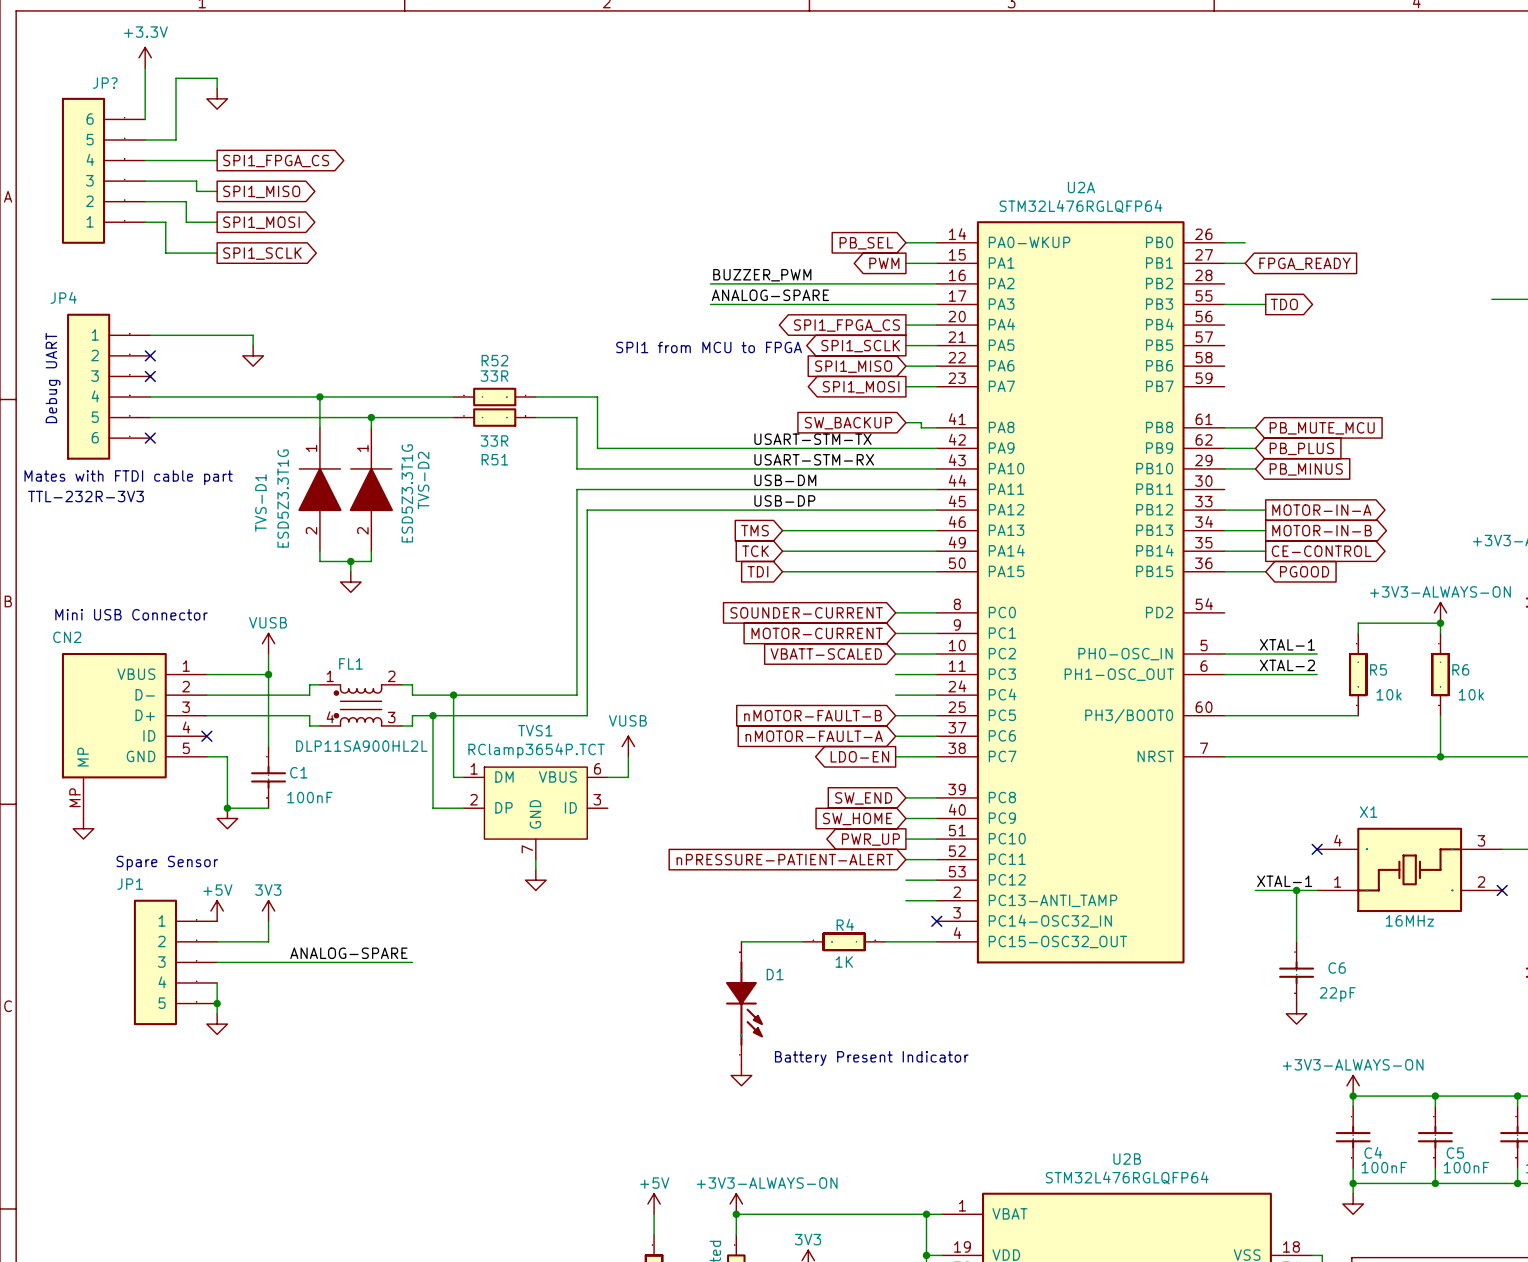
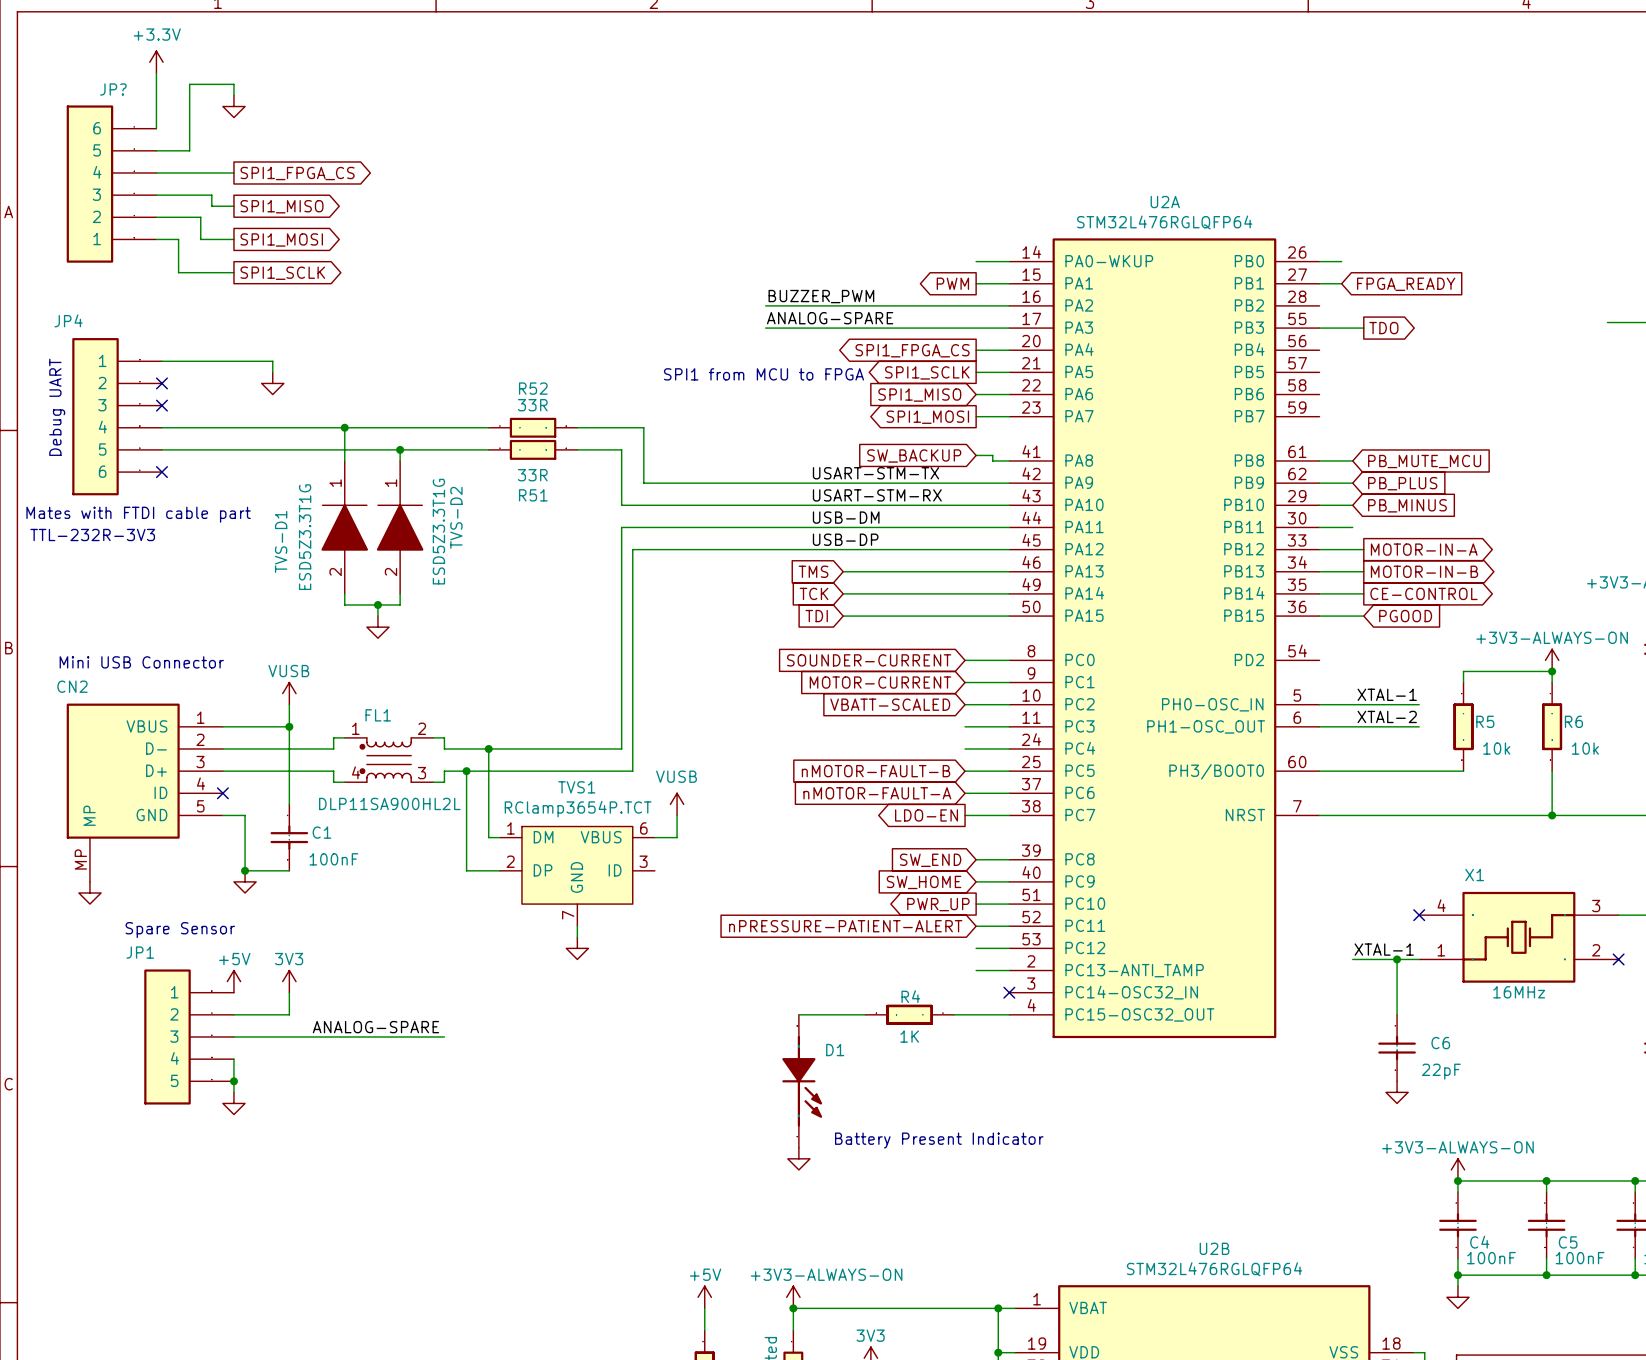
global label: PB_SEL (866, 243) -> none
wire: none -> (1319, 527) (1352, 527)

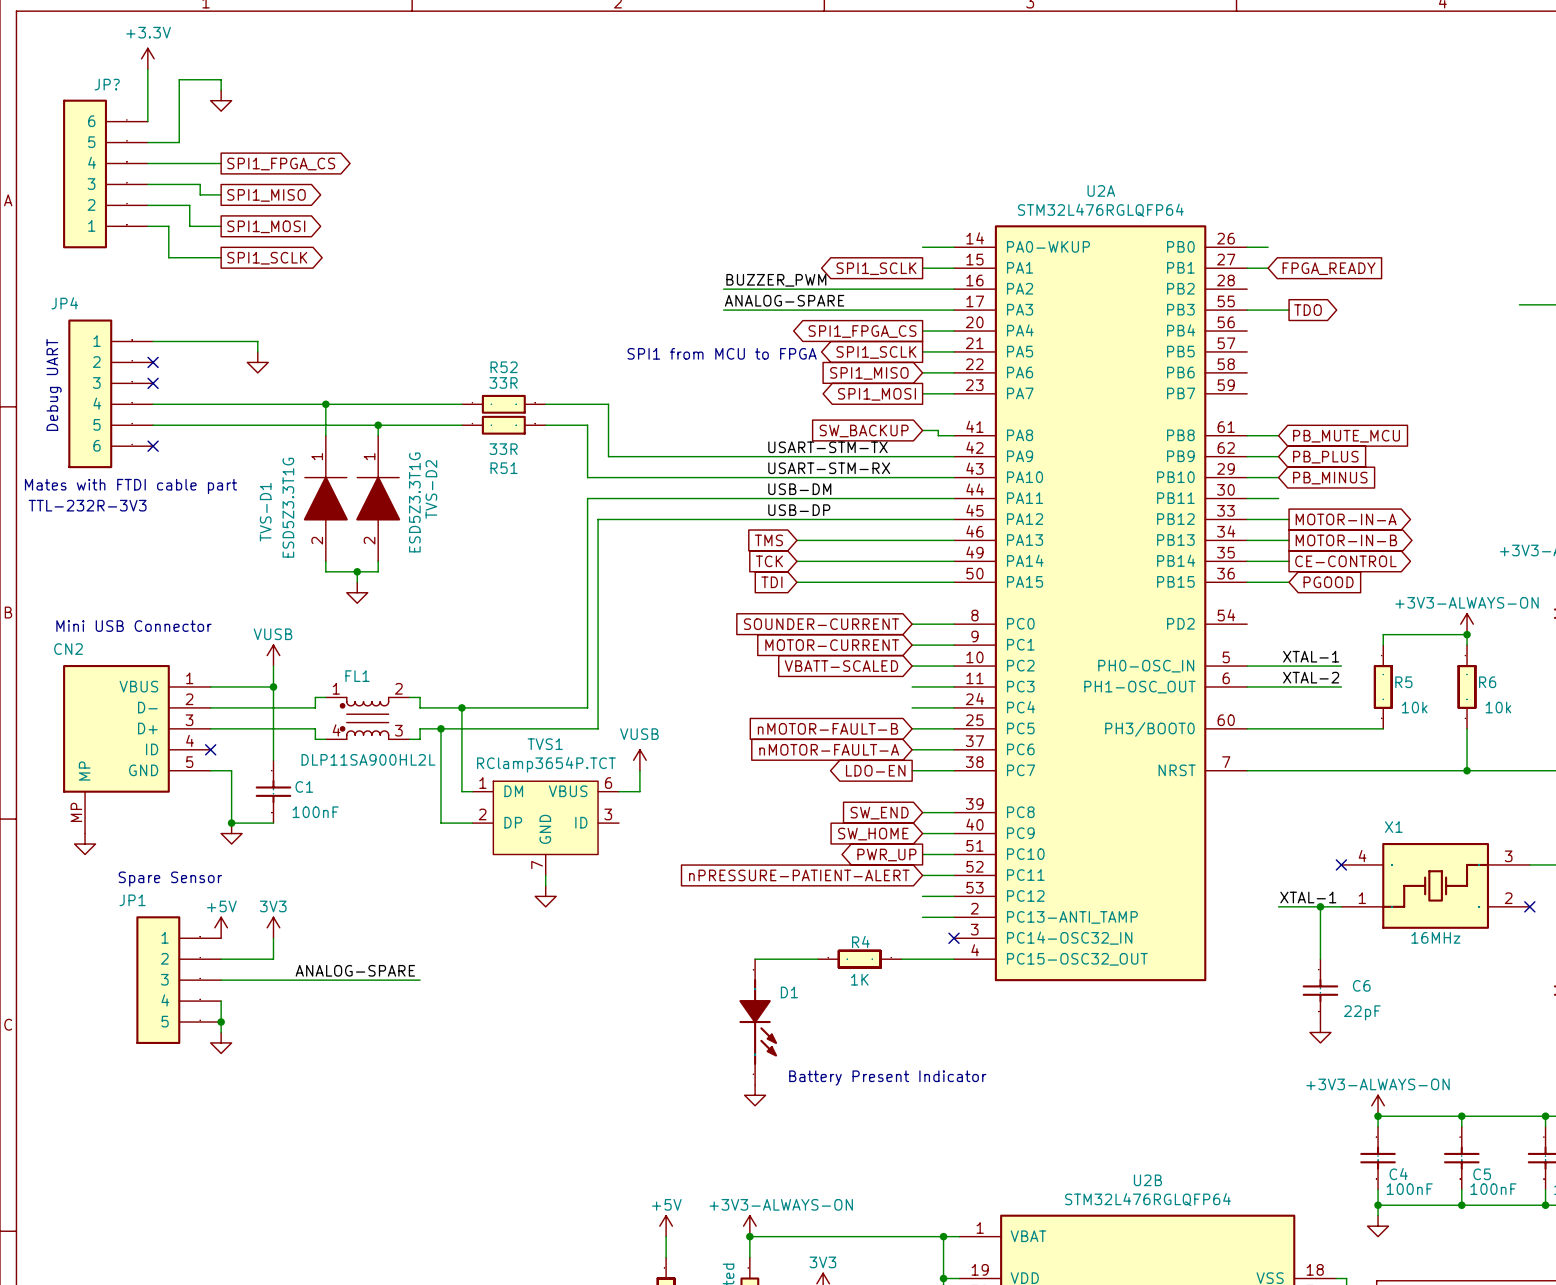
global label: PWM (952, 283) -> SPI1_SCLK (876, 268)

